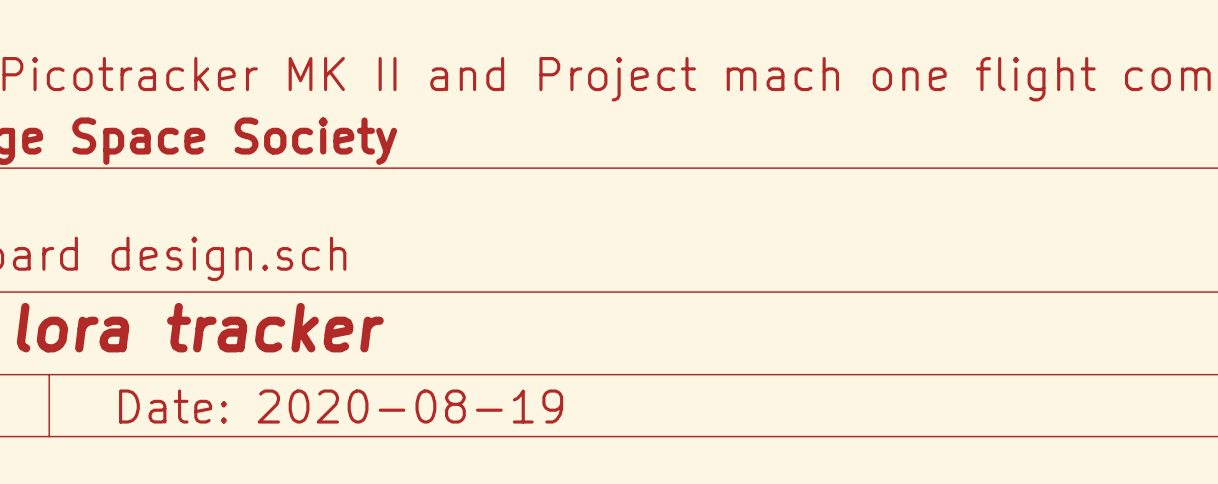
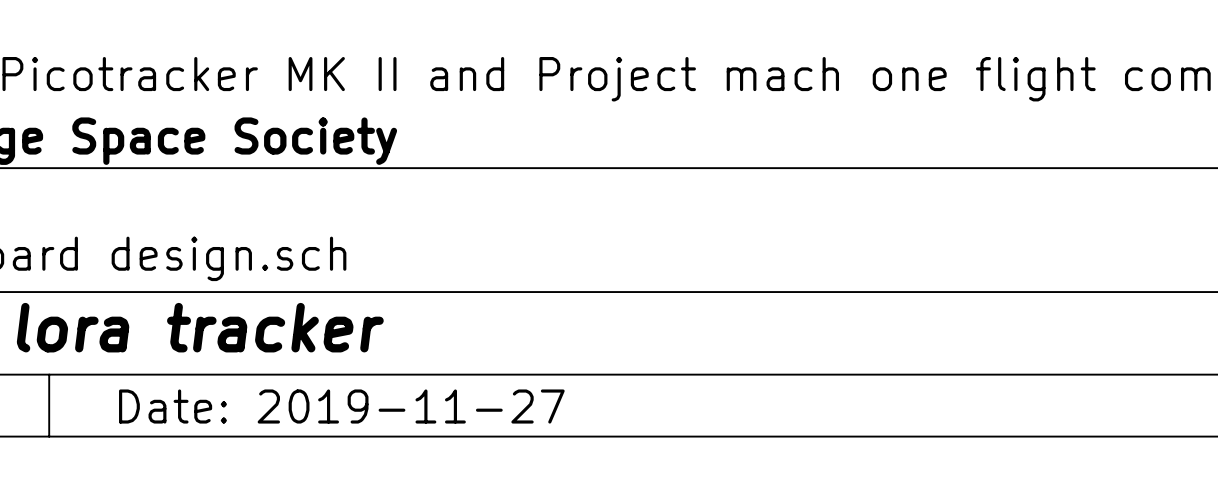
title block: Date: 2020-08-19 (341, 406) -> Date: 2019-11-27 (341, 406)

